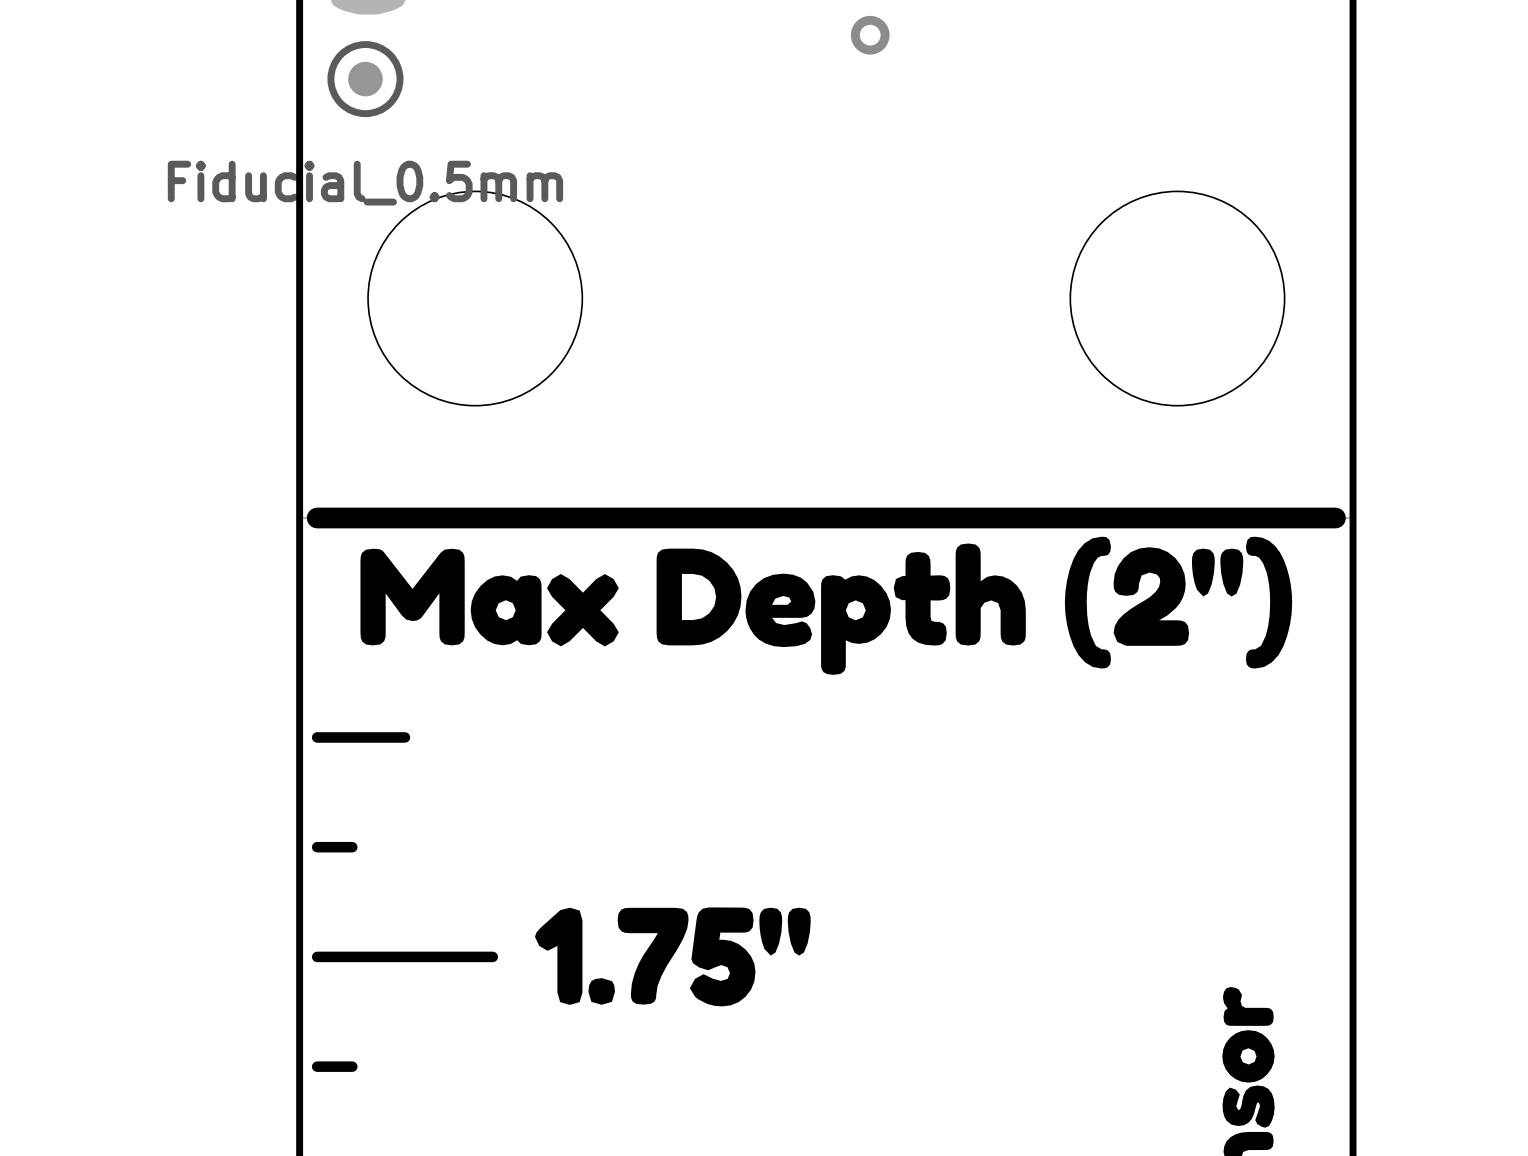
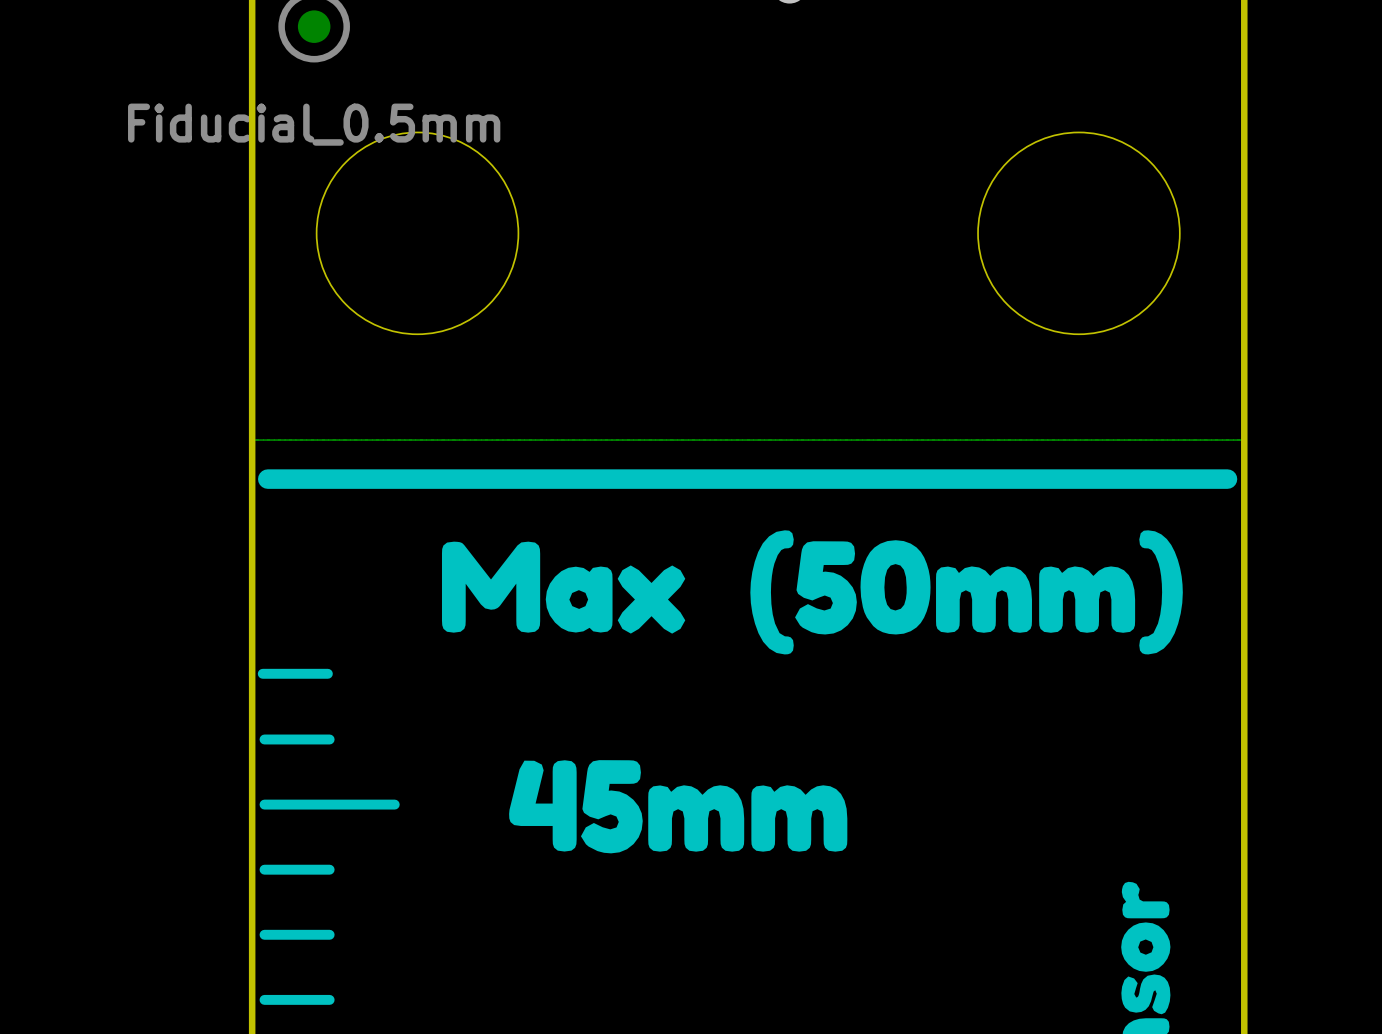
line: (1335, 518) (317, 518) -> (1227, 479) (267, 479)
drawing: [360, 536, 1293, 675] -> none
drawing: none -> [441, 530, 1183, 655]
line: (404, 737) (317, 737) -> none
line: none -> (327, 673) (262, 673)
line: none -> (329, 739) (264, 739)
line: (352, 847) (317, 847) -> none
drawing: none -> [509, 760, 848, 854]
line: none -> (394, 804) (264, 804)
drawing: [534, 907, 811, 1007] -> none
line: (492, 956) (317, 956) -> none
line: none -> (329, 869) (264, 869)
line: none -> (329, 934) (264, 934)
line: (352, 1066) (317, 1066) -> none
line: none -> (329, 999) (264, 999)

